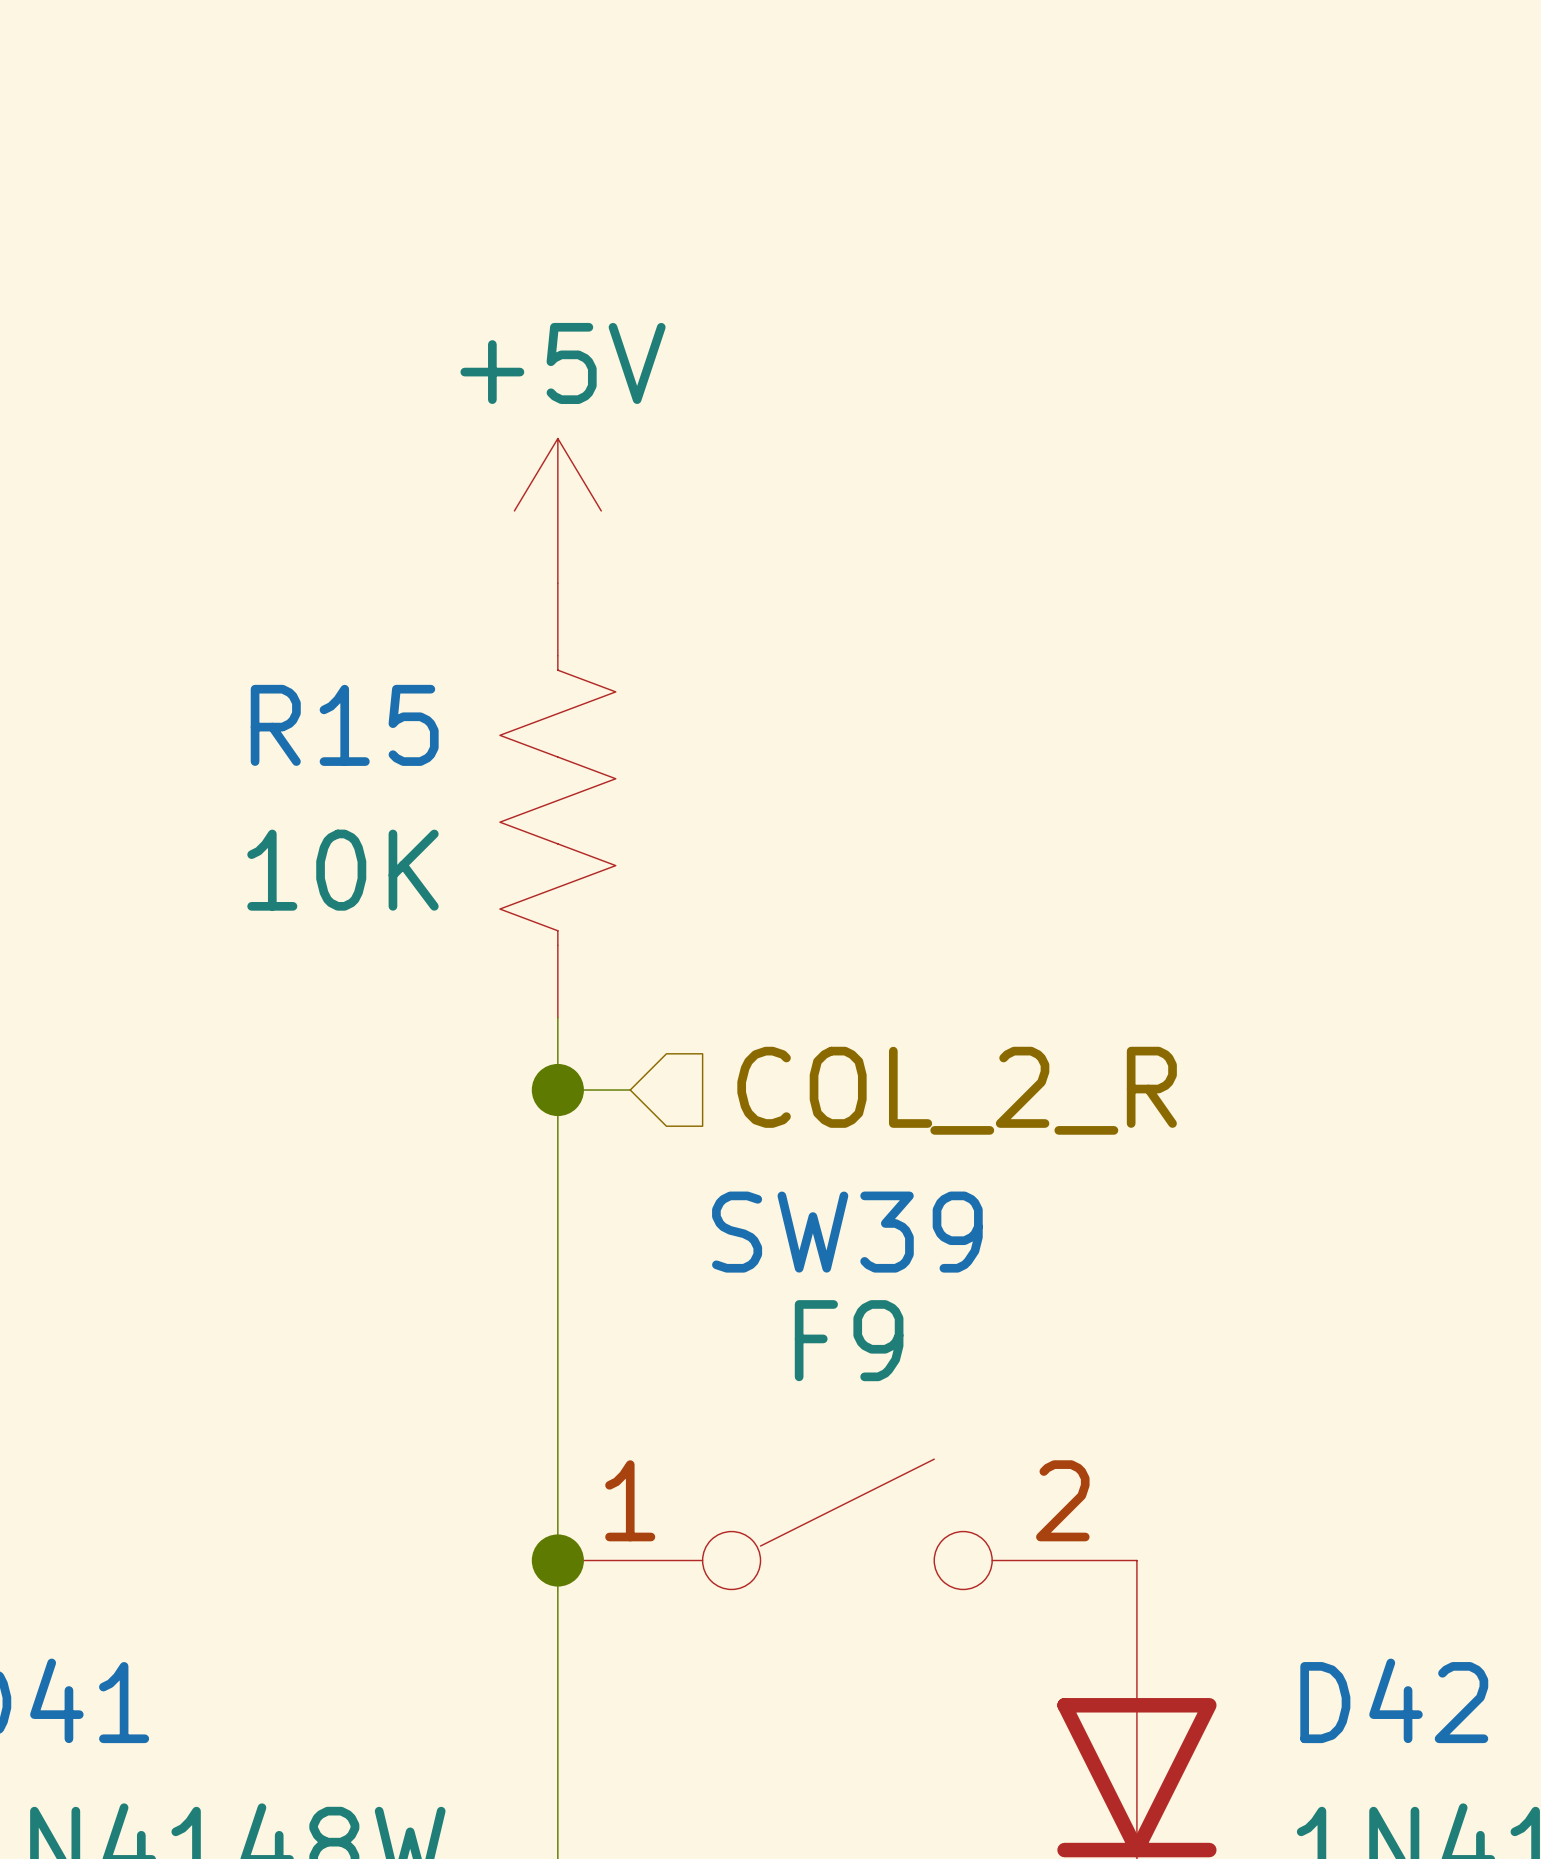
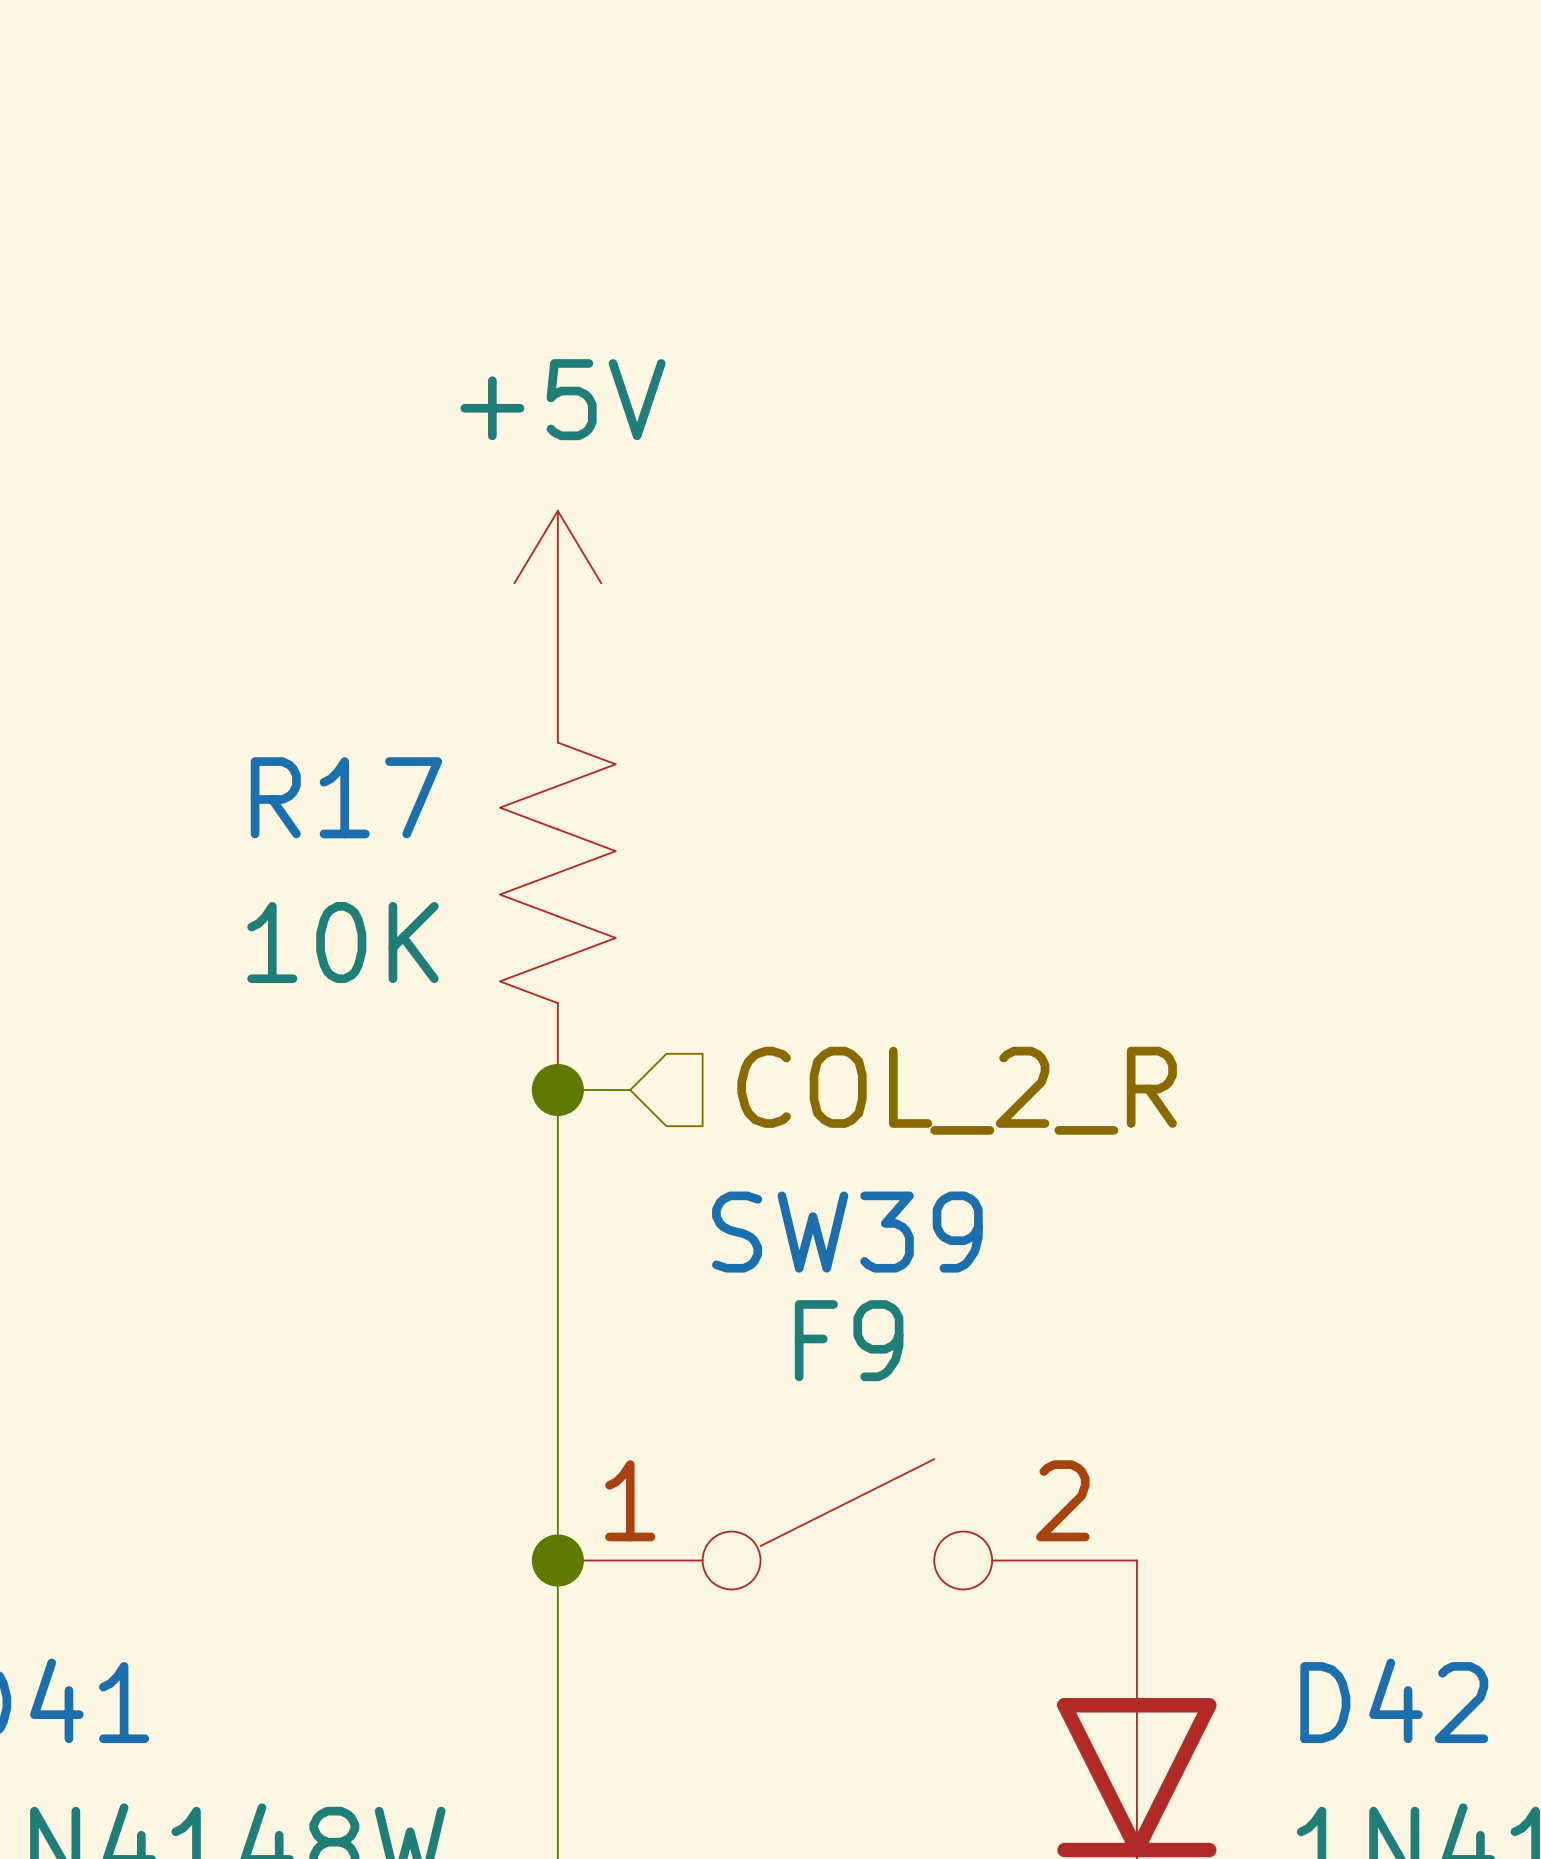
power symbol text position: +5V (563, 363) -> +5V (563, 399)
power symbol position: +5V (557, 510) -> +5V (557, 583)
R15: 10K (557, 800) -> none
R17: none -> 10K (557, 872)

